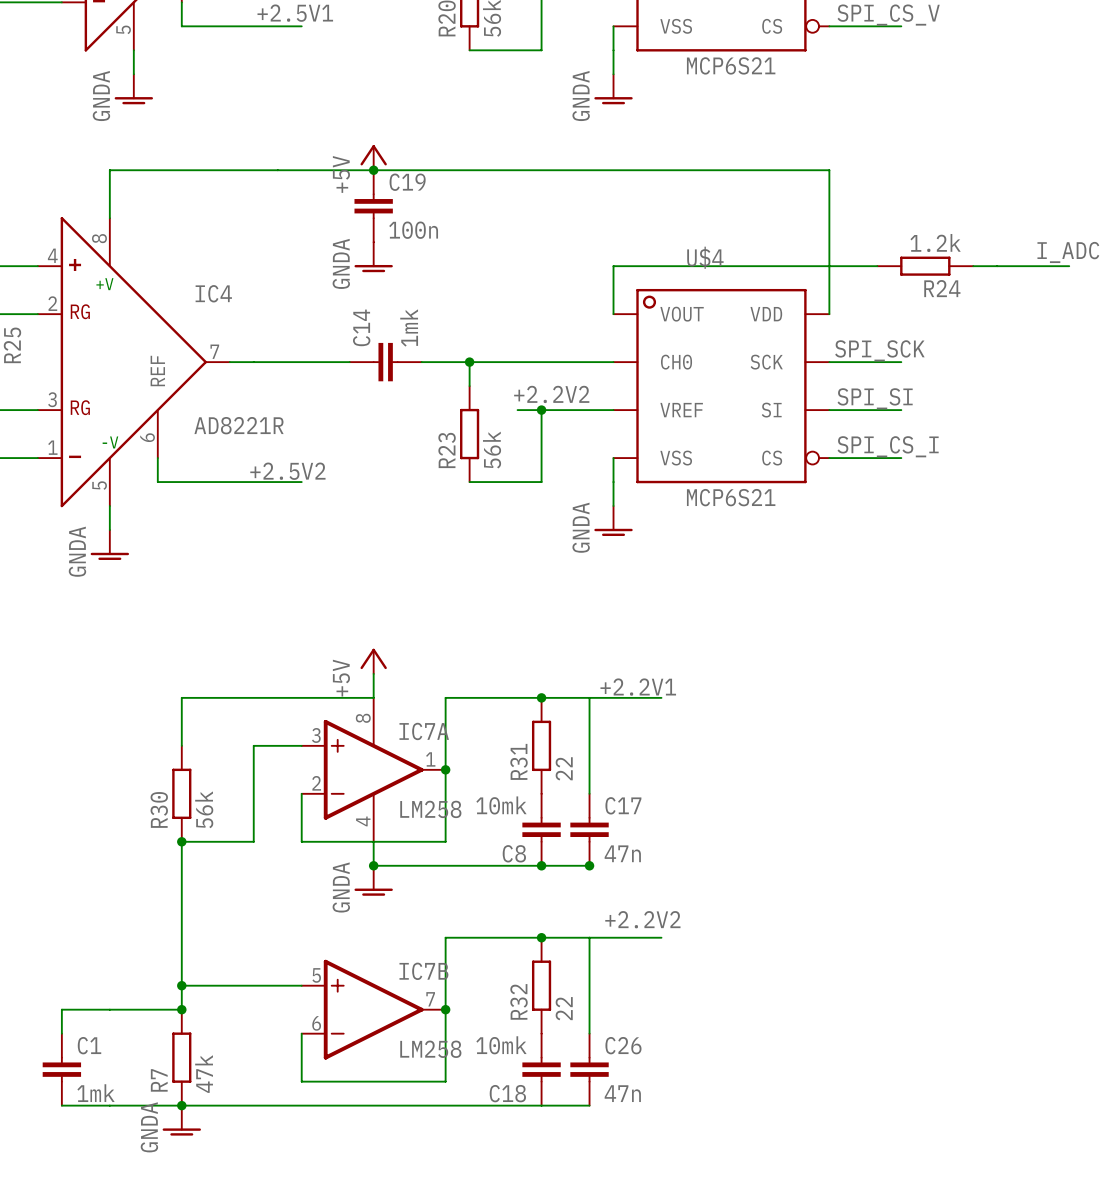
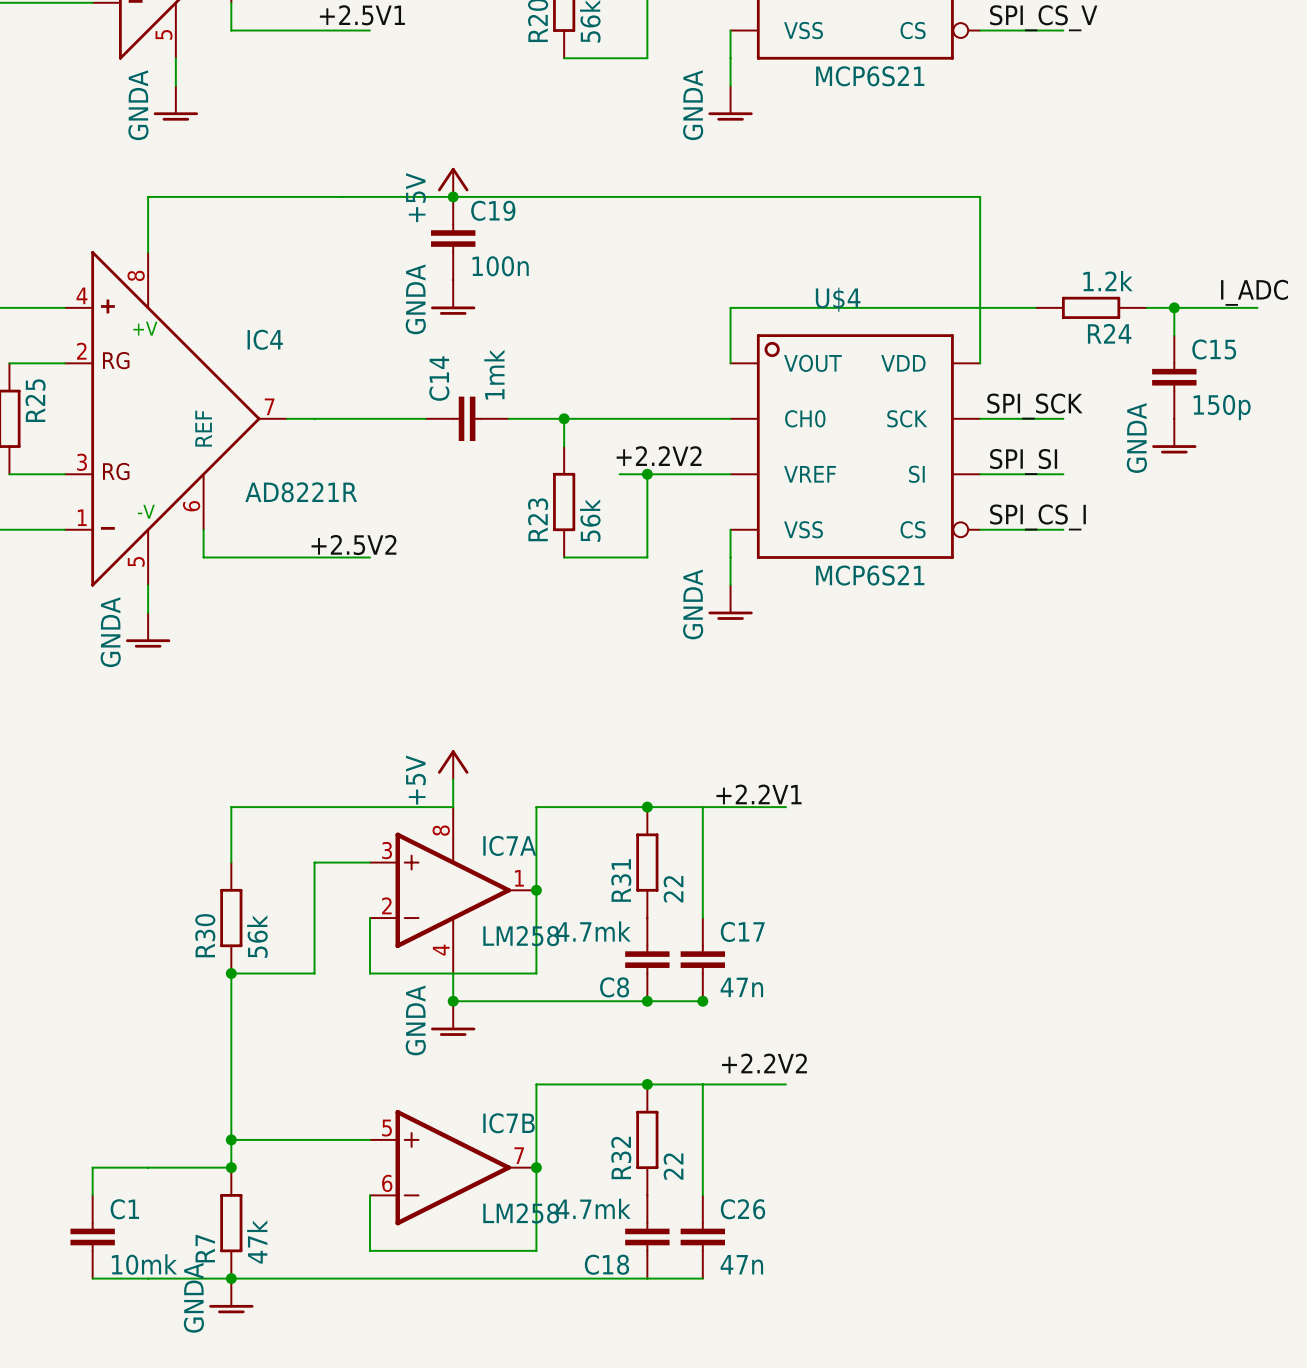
wire: none -> (1174, 307) (1174, 335)
junction: none -> (1174, 307)
C15: none -> 150p (1174, 377)
power symbol: none -> GNDA (1174, 436)
C8 value: 10mk (501, 805) -> 4.7mk (593, 931)
C18 value: 10mk (501, 1045) -> 4.7mk (593, 1208)
C1 value: 1mk (96, 1093) -> 10mk (144, 1264)

